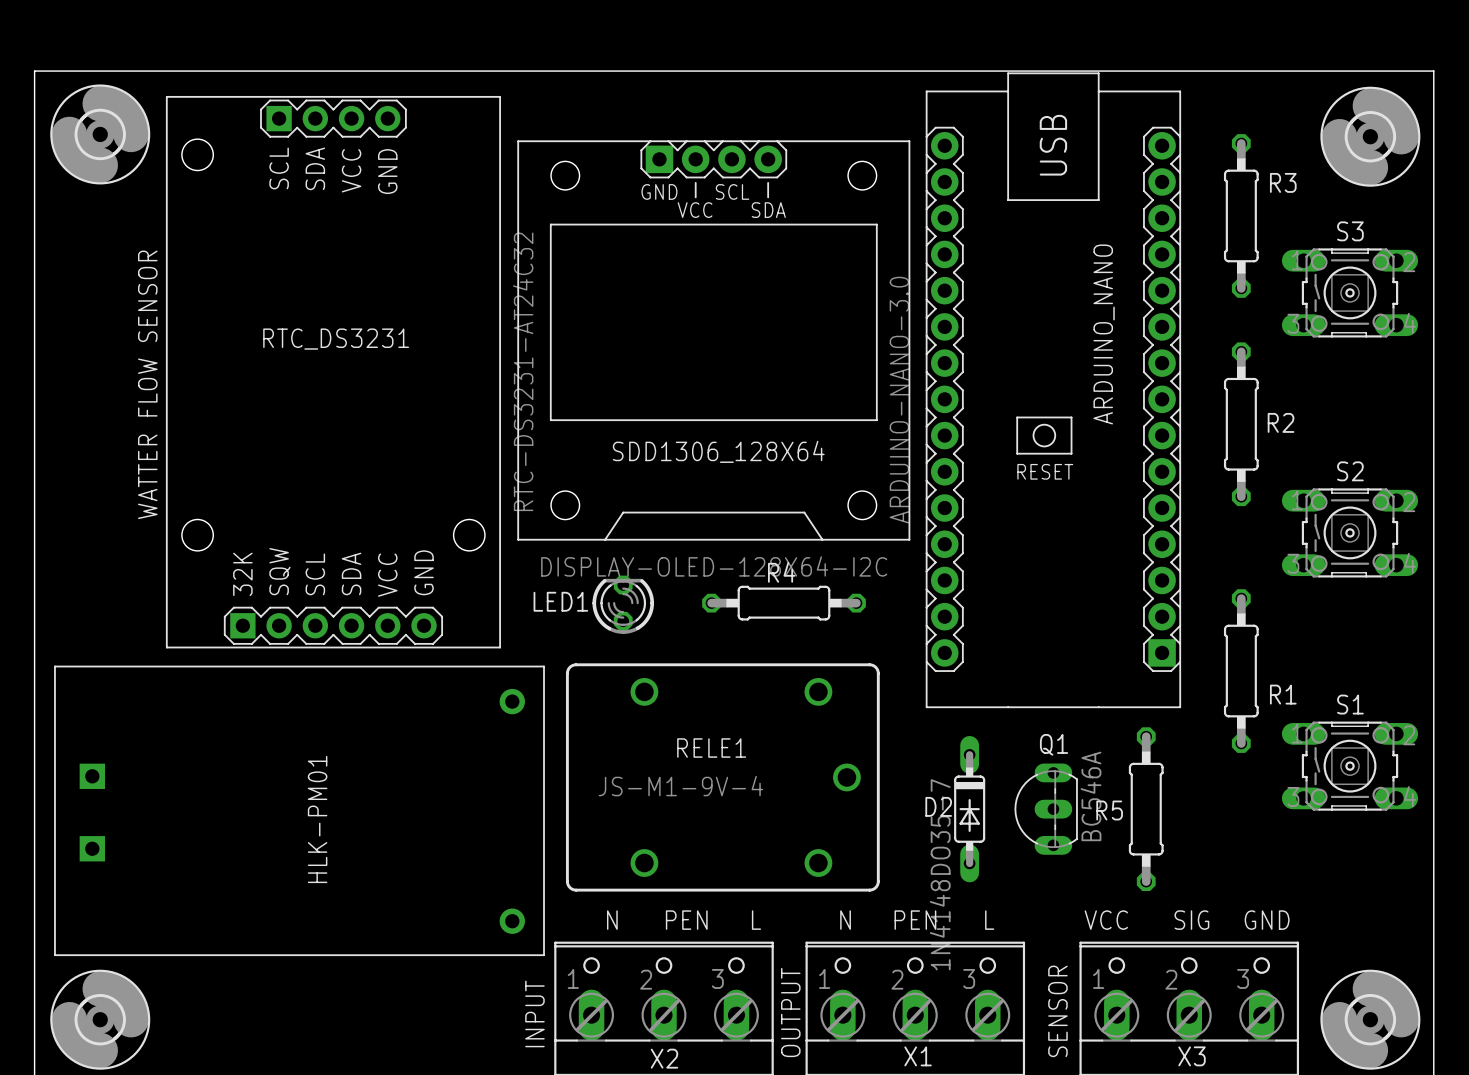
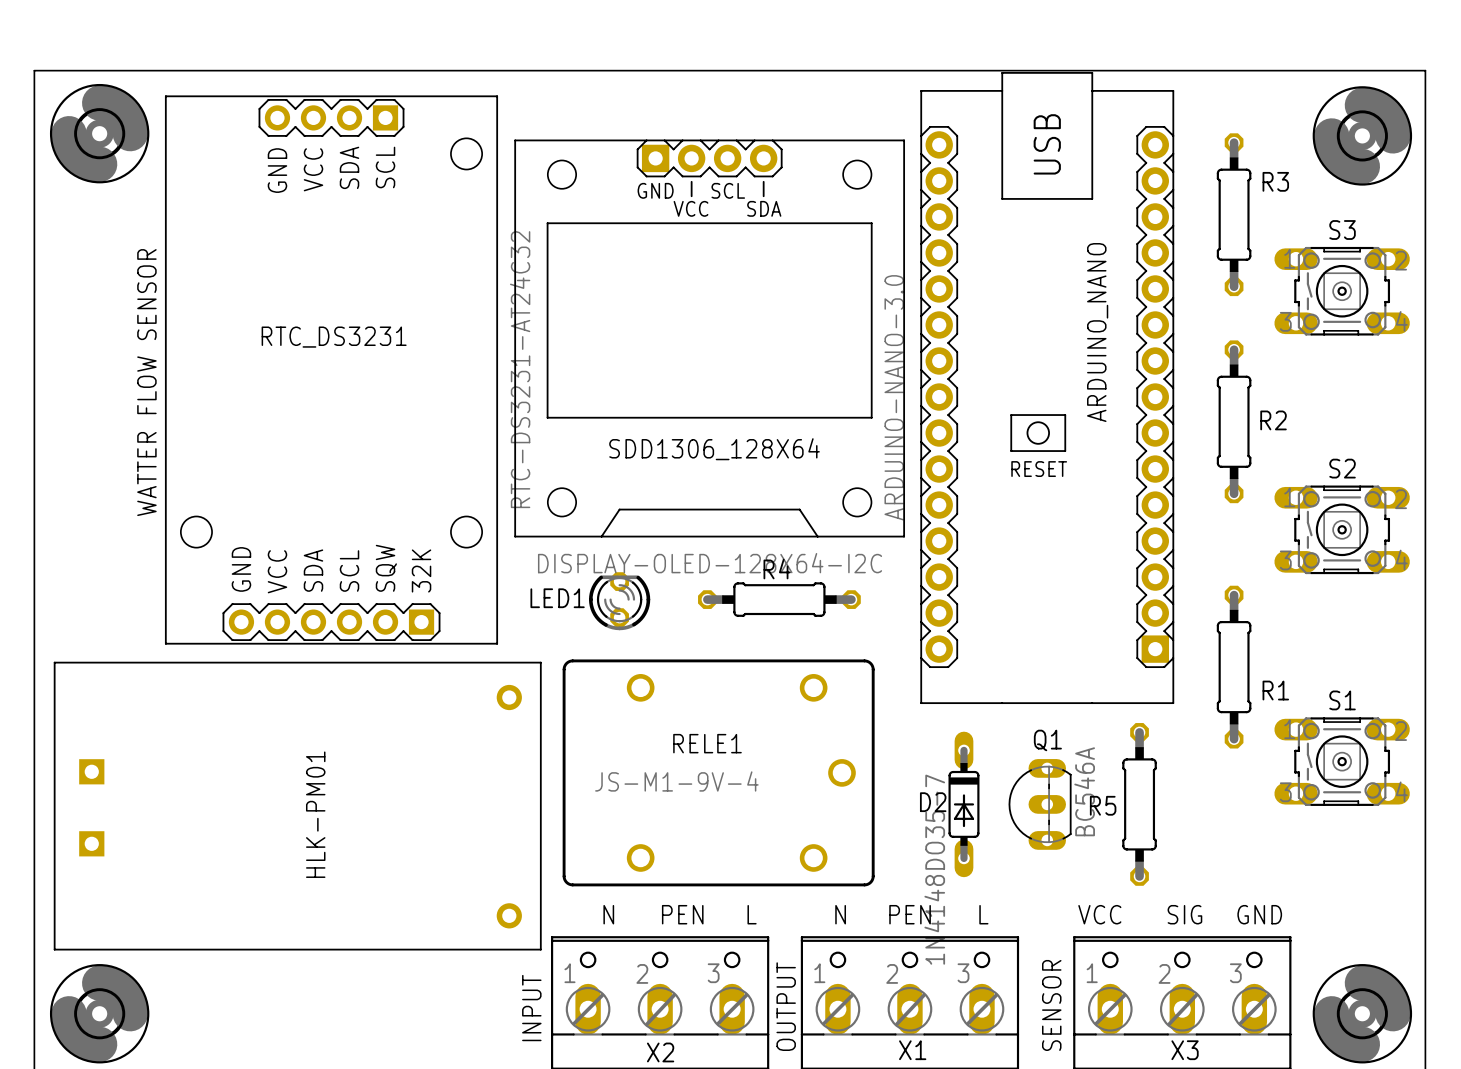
RTC_DS3231 footprint: [165, 95, 501, 649] -> [164, 95, 499, 645]

